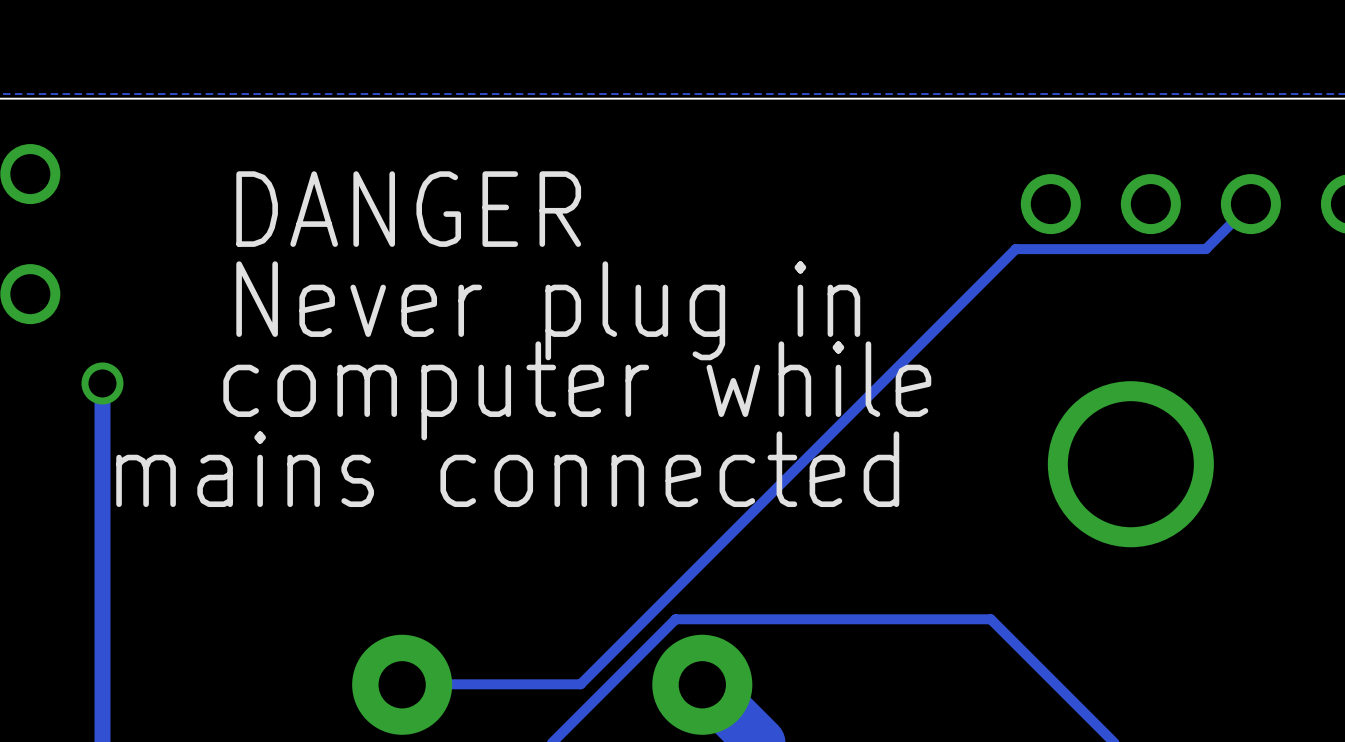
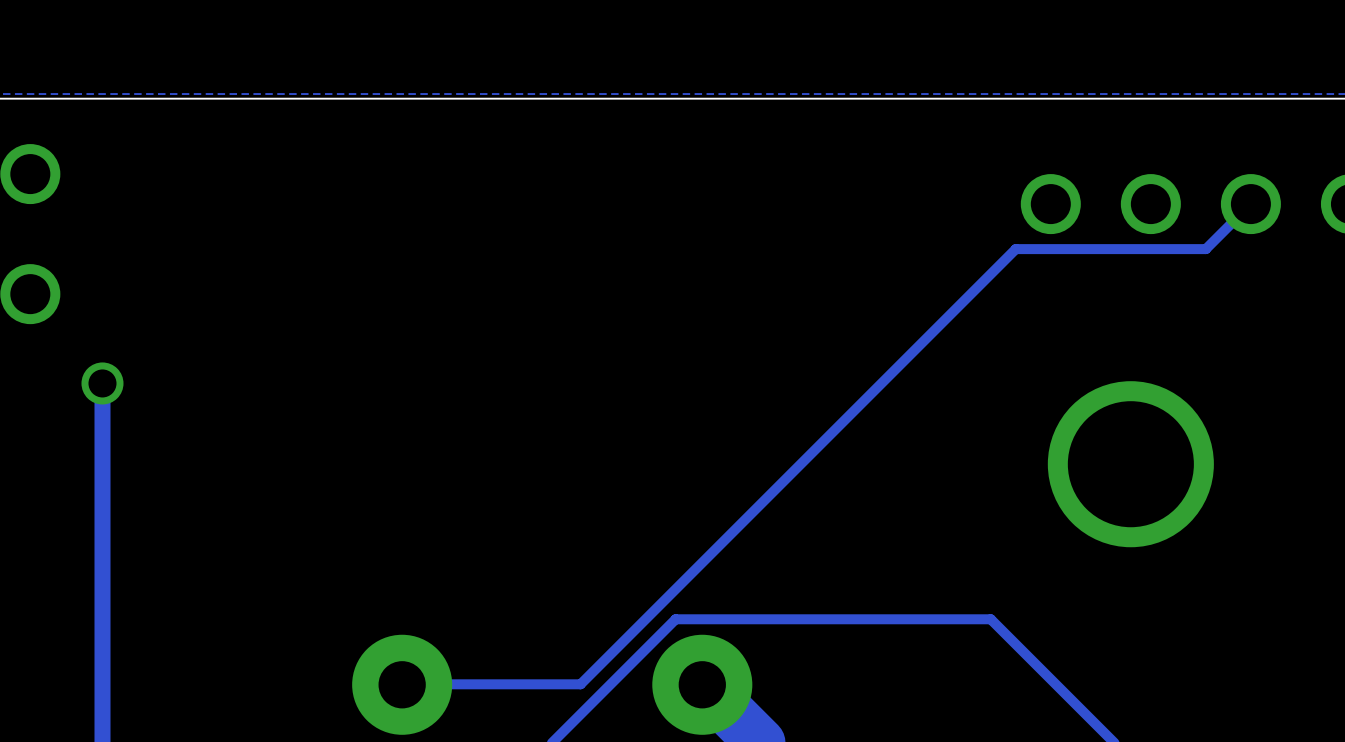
text: DANGER (408, 209) -> none
text: Never plug in (548, 310) -> none
text: computer while (577, 390) -> none
text: mains connected (507, 469) -> none

